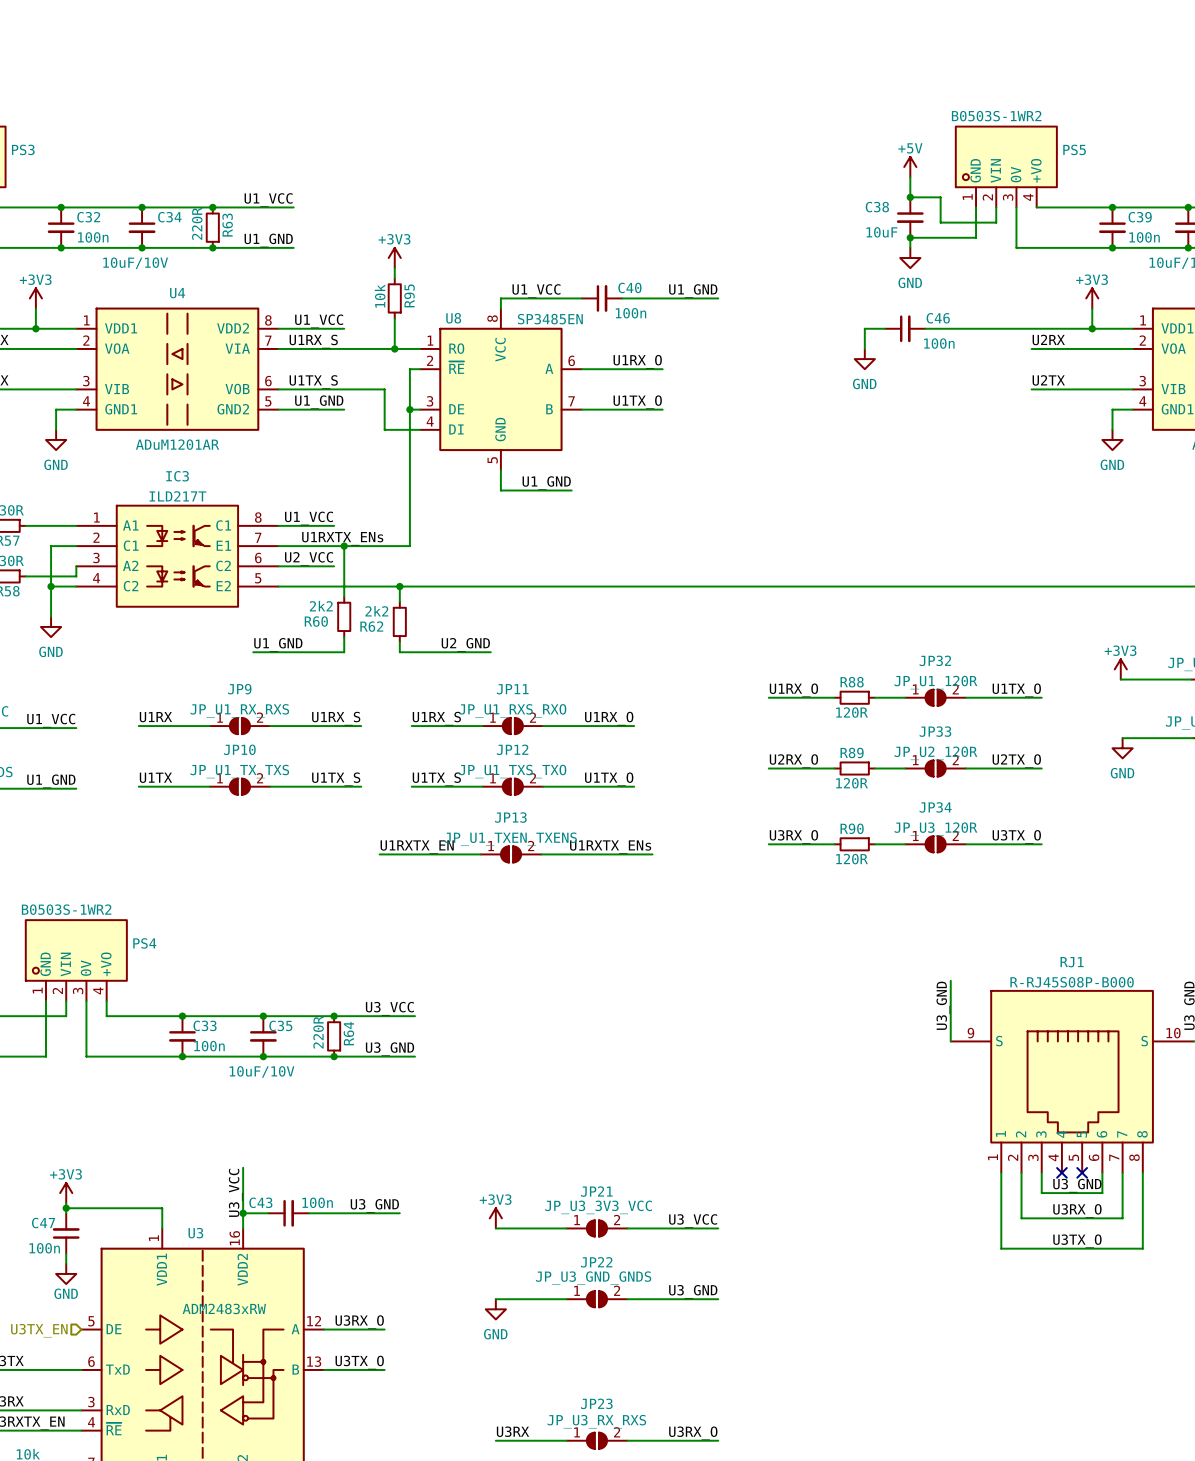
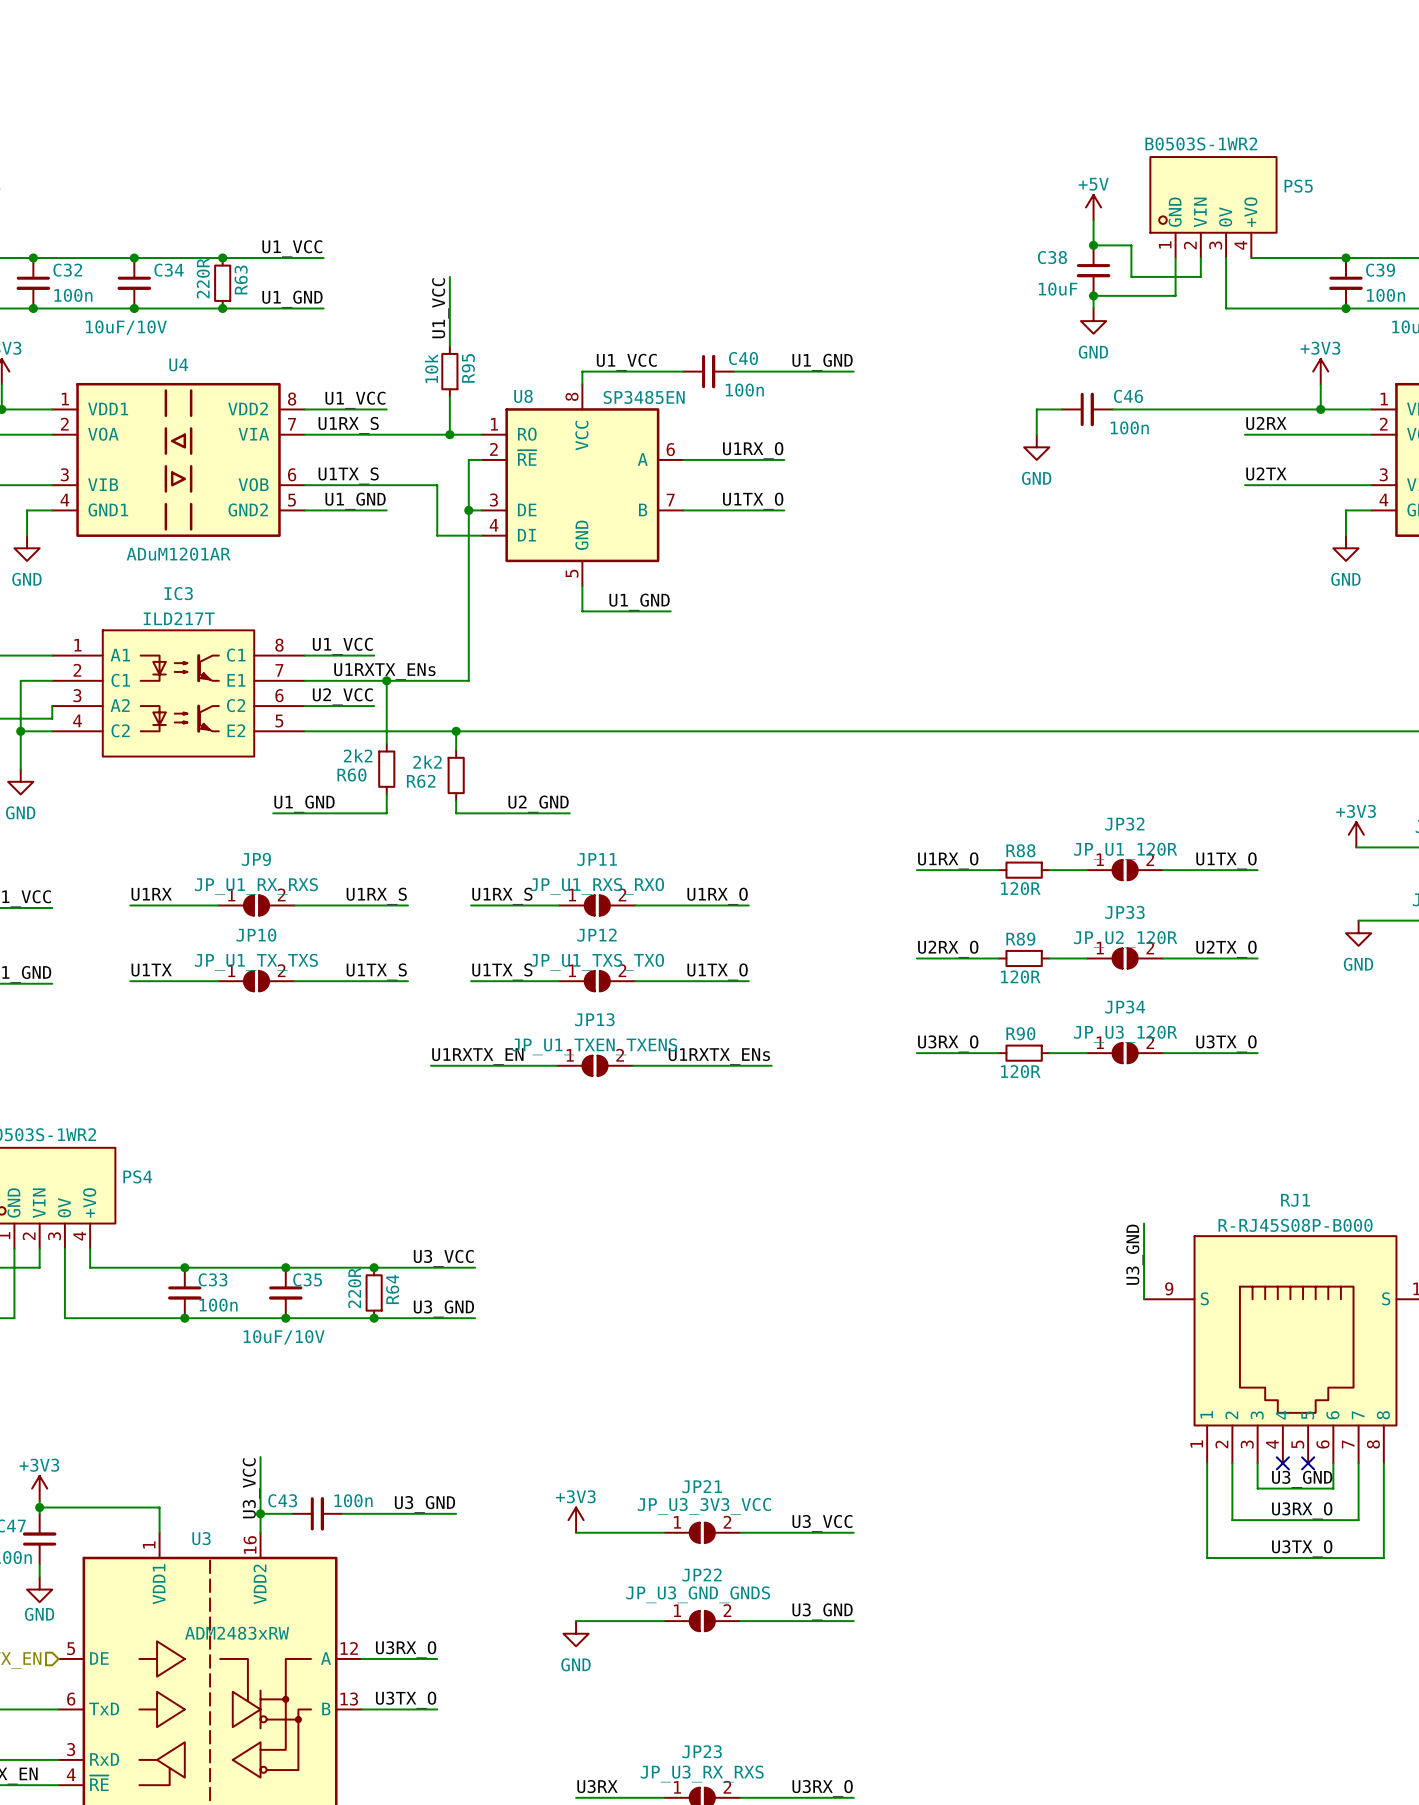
wire: none -> (449, 276) (449, 333)
label: none -> U1_VCC (440, 308)
power symbol: +3V3 (394, 258) -> none

